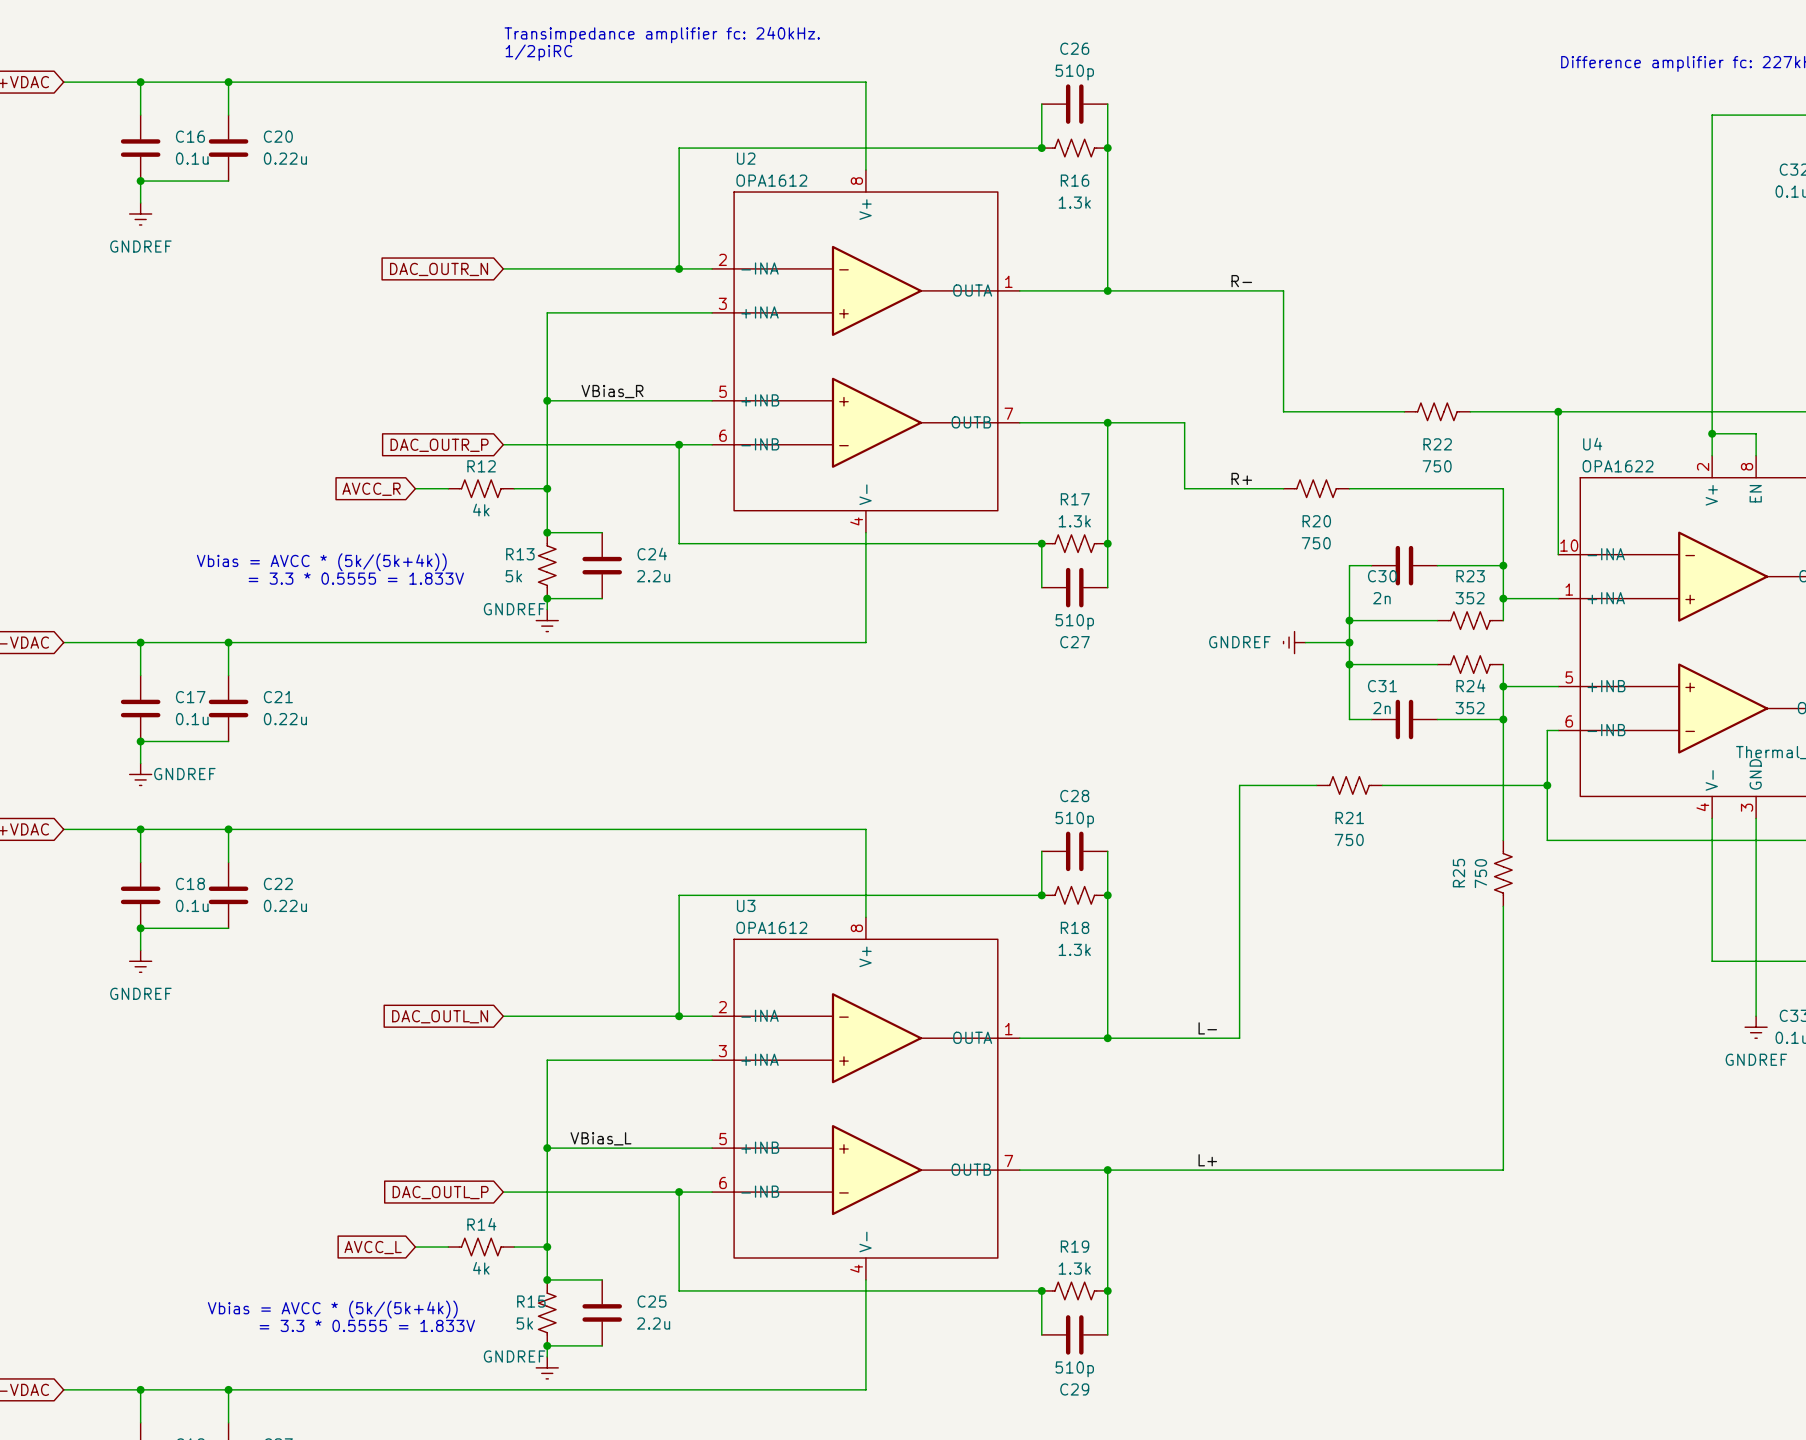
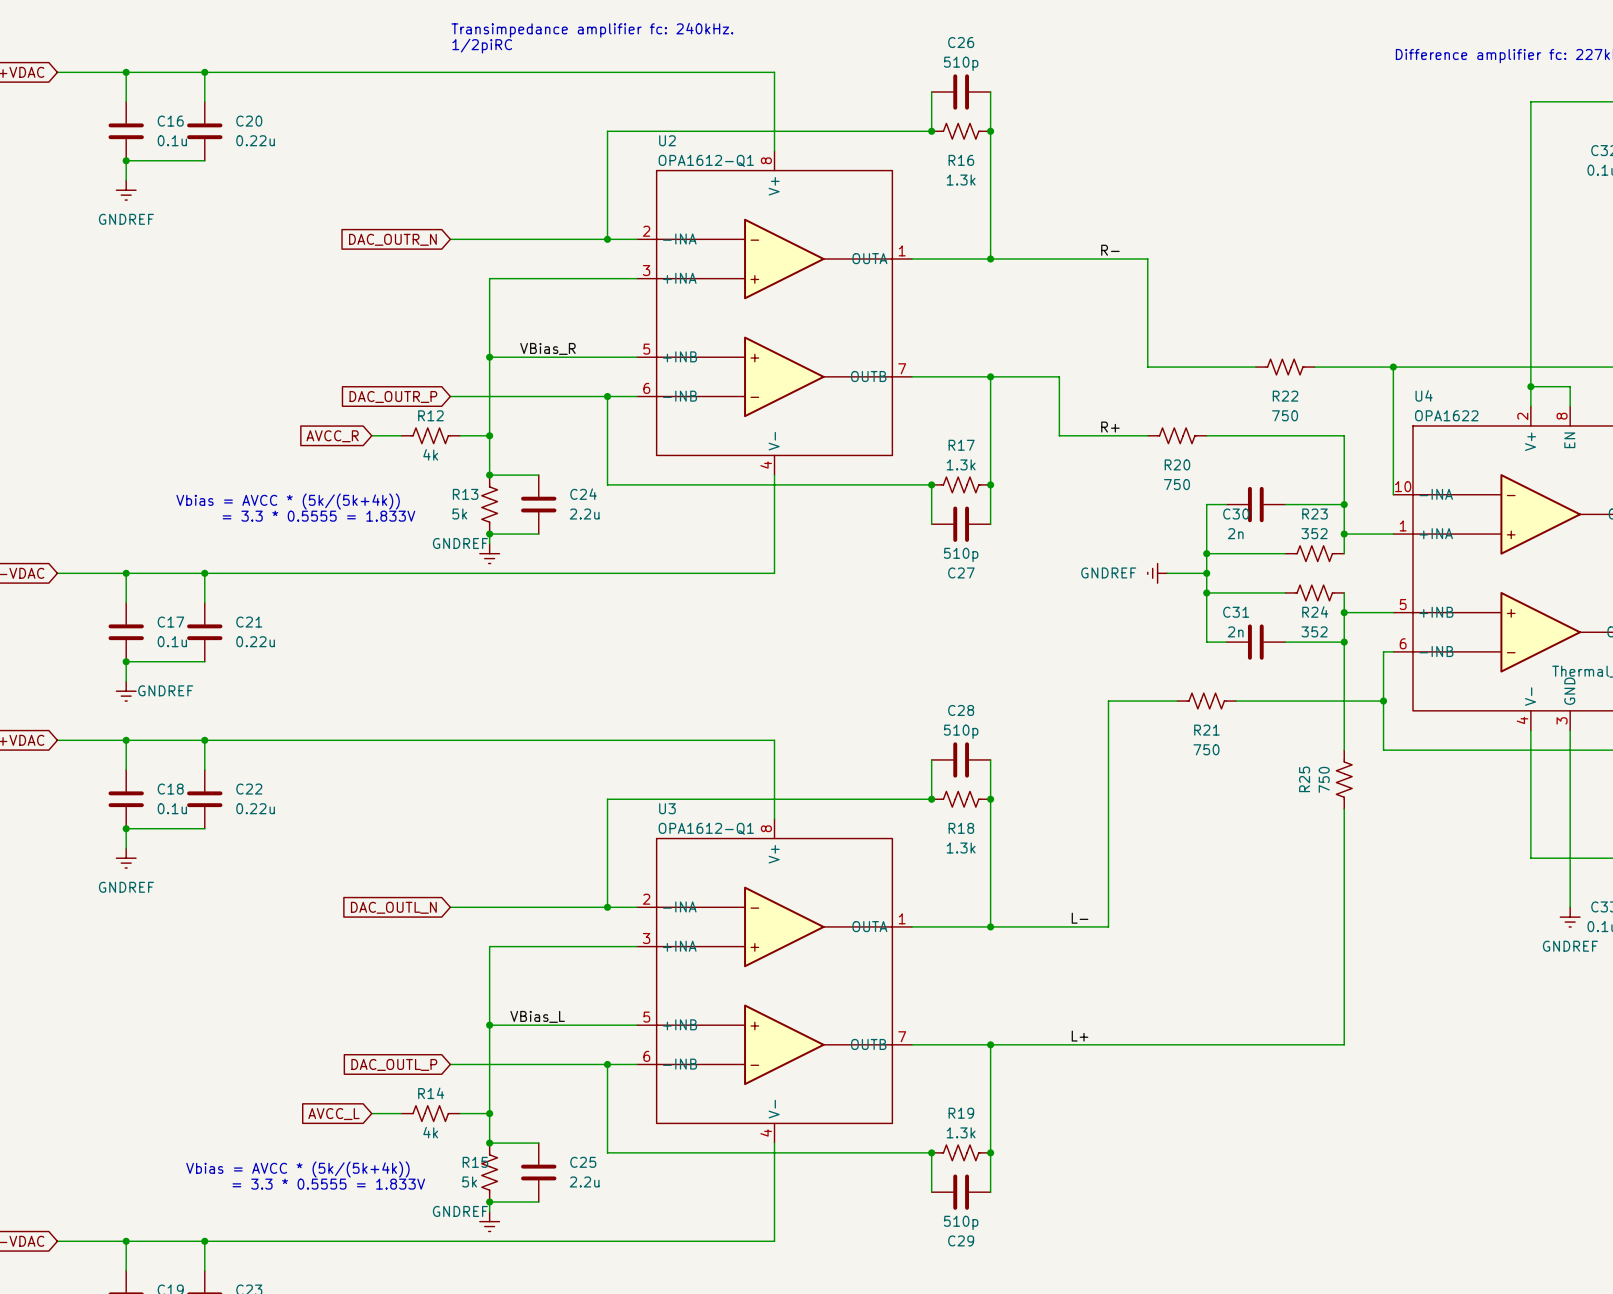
U2 value: OPA1612 (771, 180) -> OPA1612-Q1 (706, 160)
U3 value: OPA1612 (771, 927) -> OPA1612-Q1 (706, 828)

